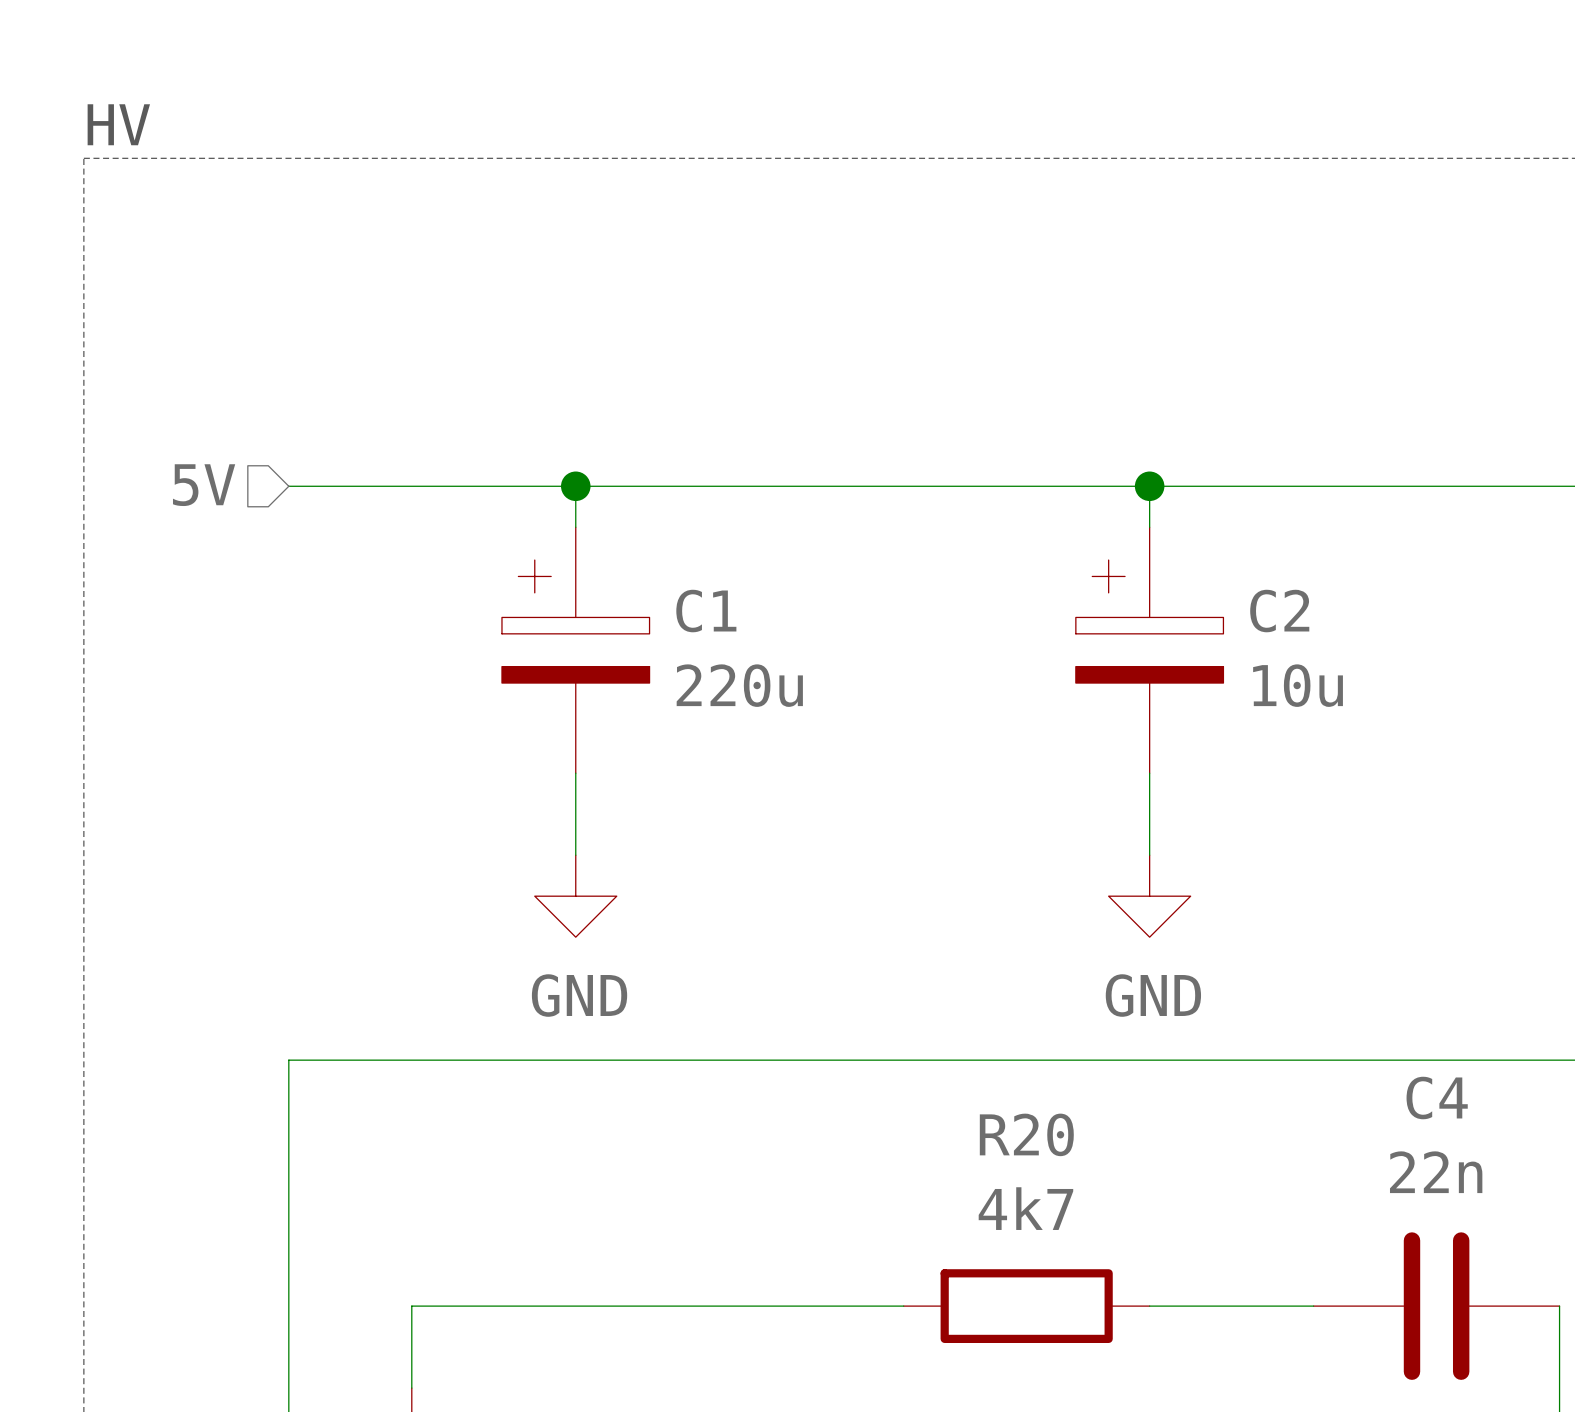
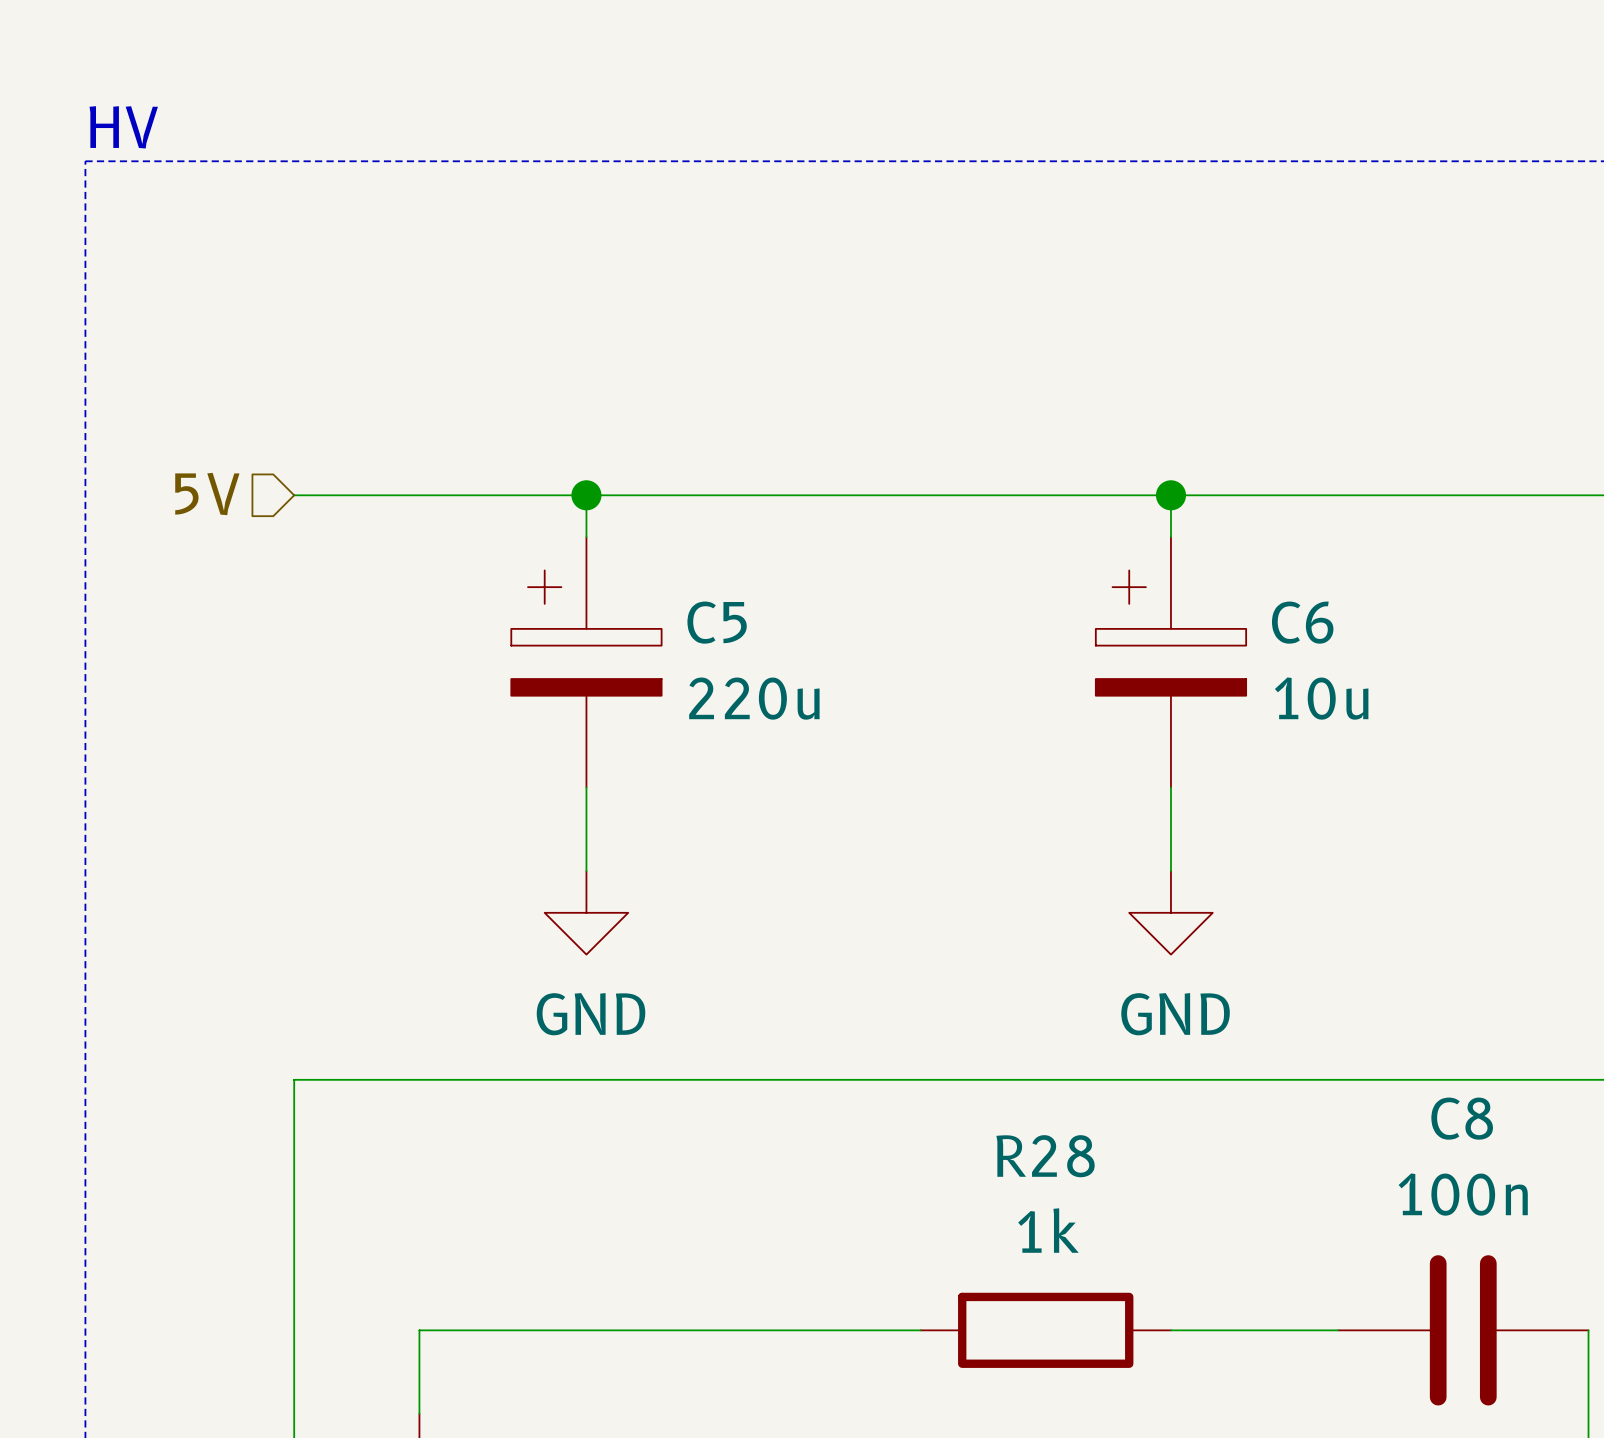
C1 name: C1 (706, 611) -> C5 (717, 622)
C2 name: C2 (1279, 611) -> C6 (1302, 622)
C4 name: C4 (1437, 1098) -> C8 (1462, 1118)
R20 name: R20 (1026, 1134) -> R28 (1045, 1156)
C4 value: 22n (1436, 1172) -> 100n (1463, 1194)
R20 value: 4k7 (1025, 1208) -> 1k (1048, 1230)

